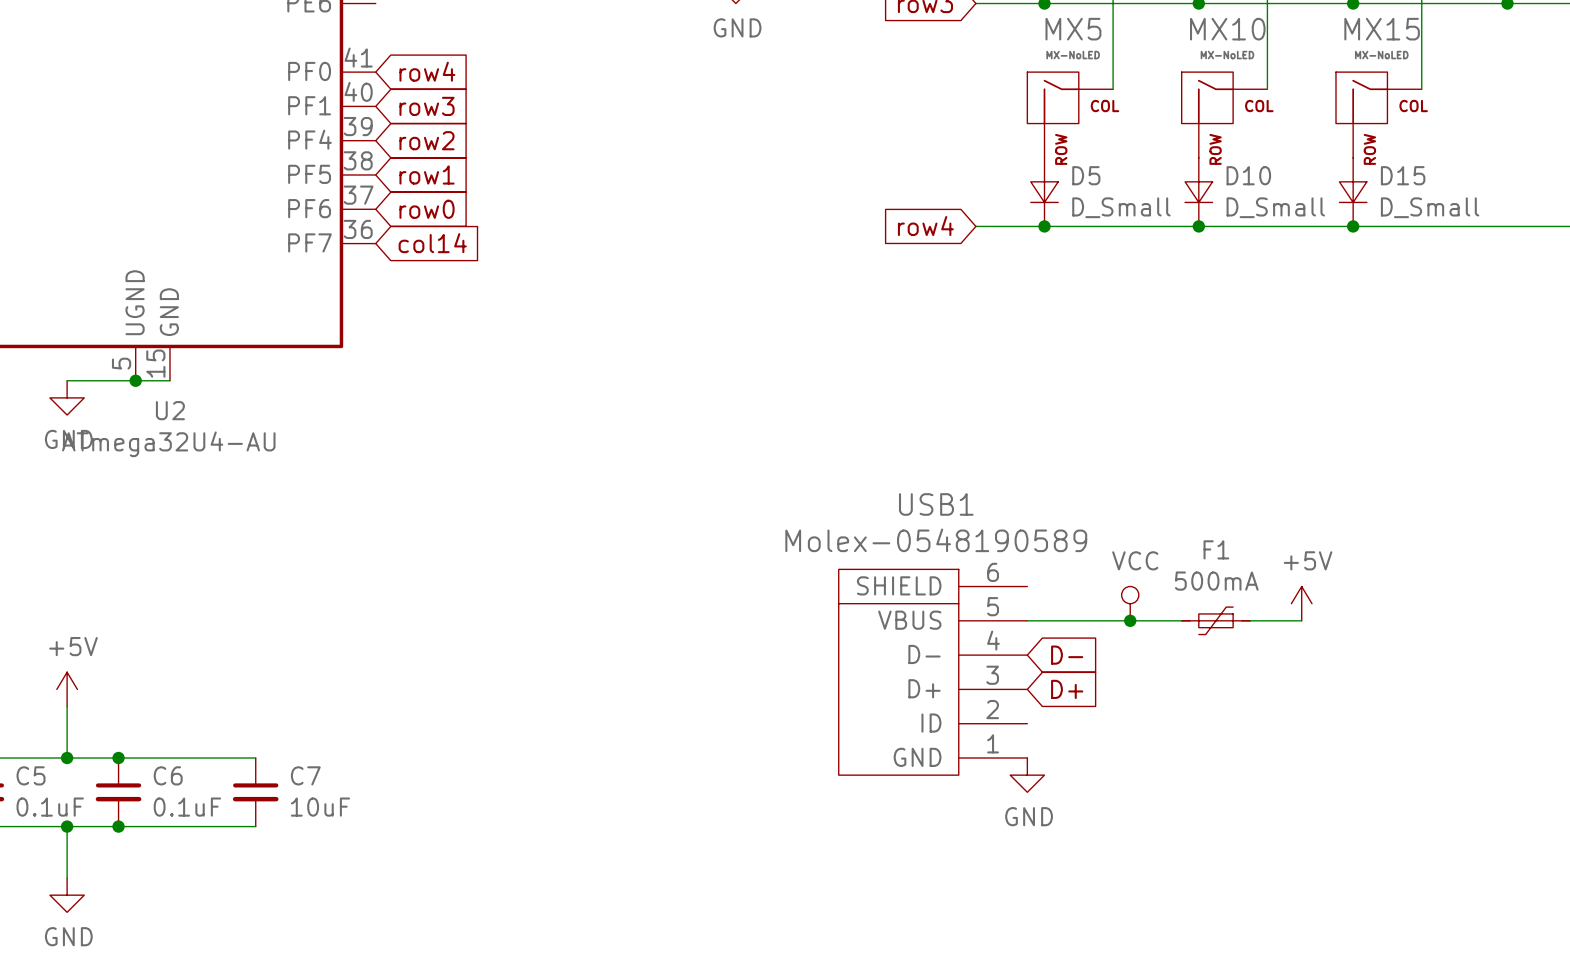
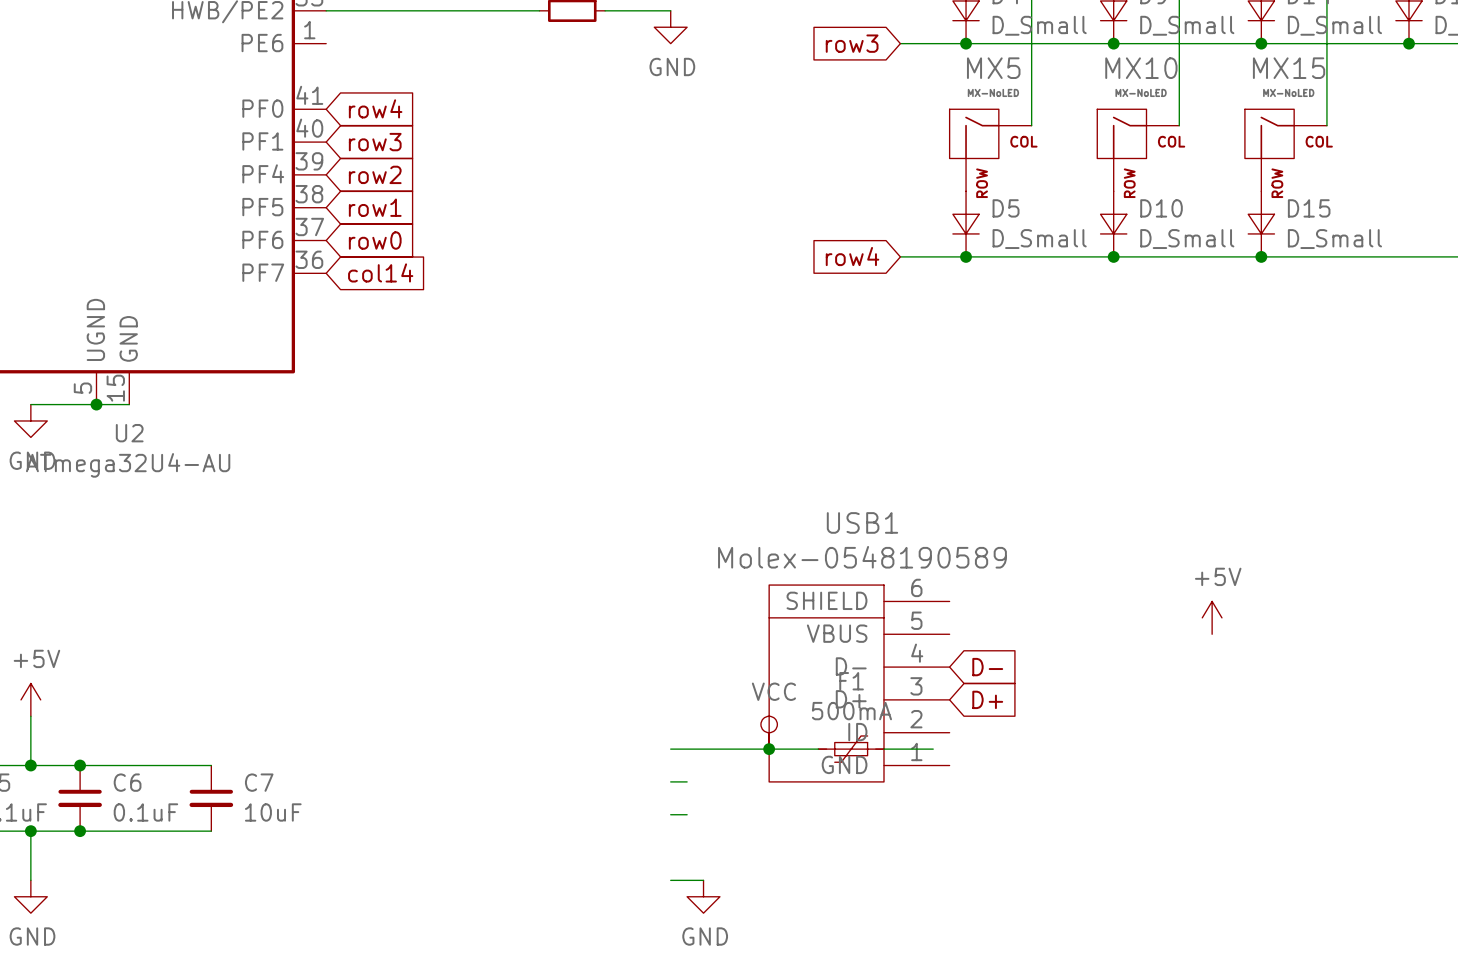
power symbol position: VCC (1130, 603) -> VCC (769, 732)
wire: (1027, 620) (1181, 620) -> (670, 749) (818, 749)
junction: (1130, 620) -> none
F1 position: (1215, 620) -> (851, 749)
wire: (1250, 620) (1301, 620) -> (883, 749) (933, 749)
junction: none -> (769, 749)
wire: none -> (670, 781) (687, 781)
power symbol position: GND (1027, 775) -> GND (703, 896)
wire: none -> (670, 814) (687, 814)
wire: none -> (670, 880) (703, 880)

